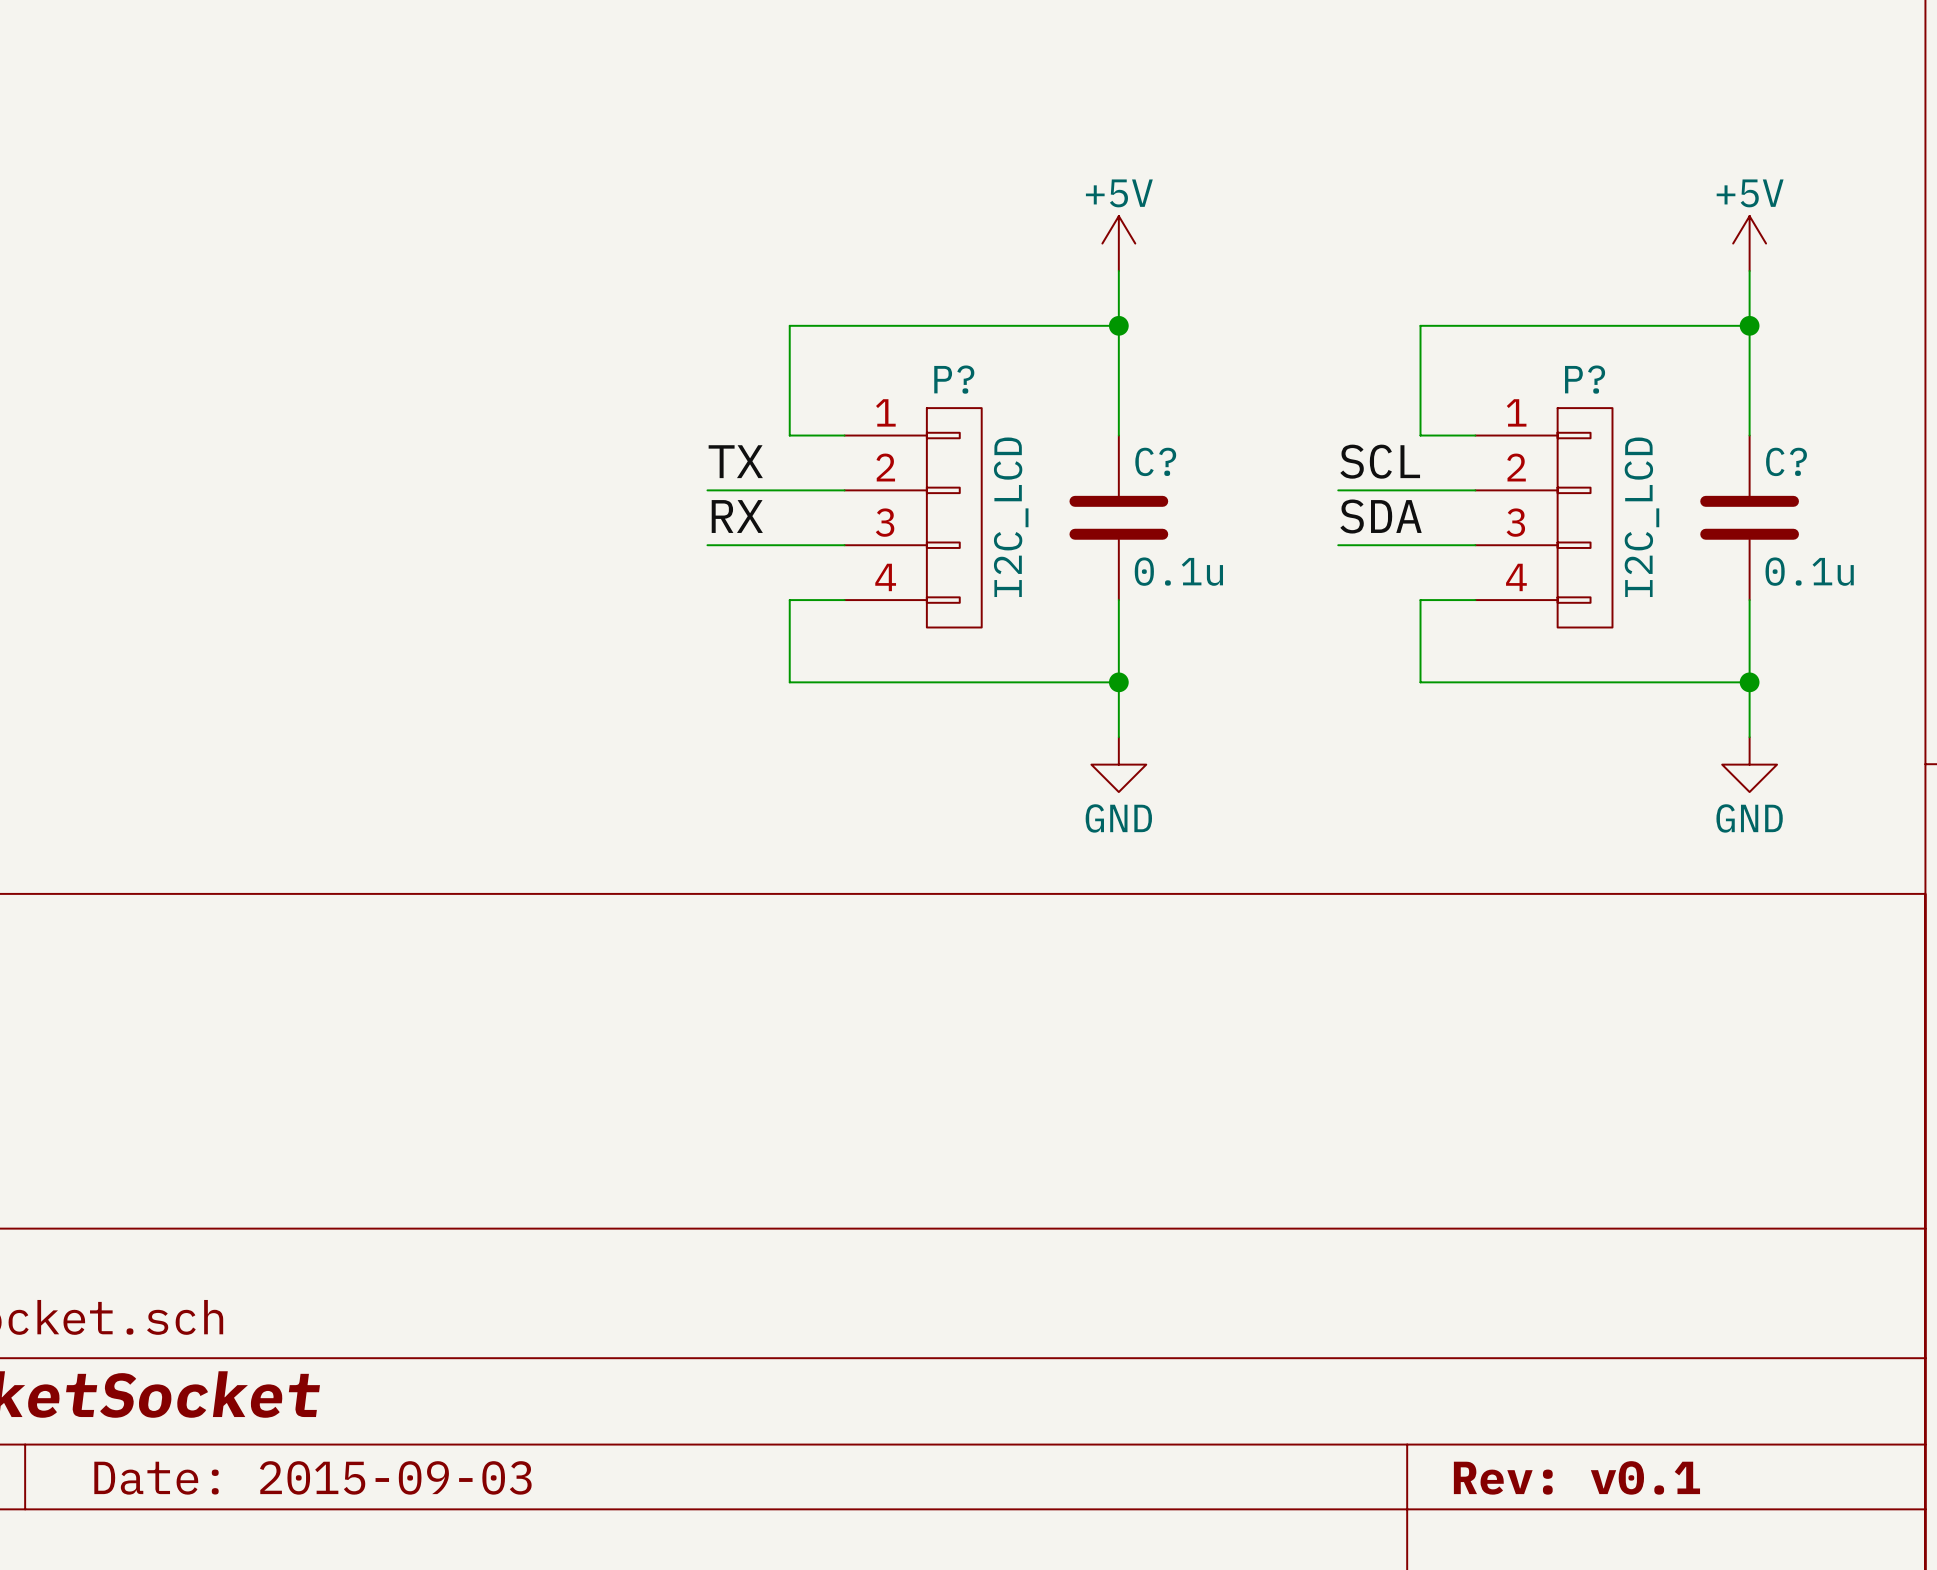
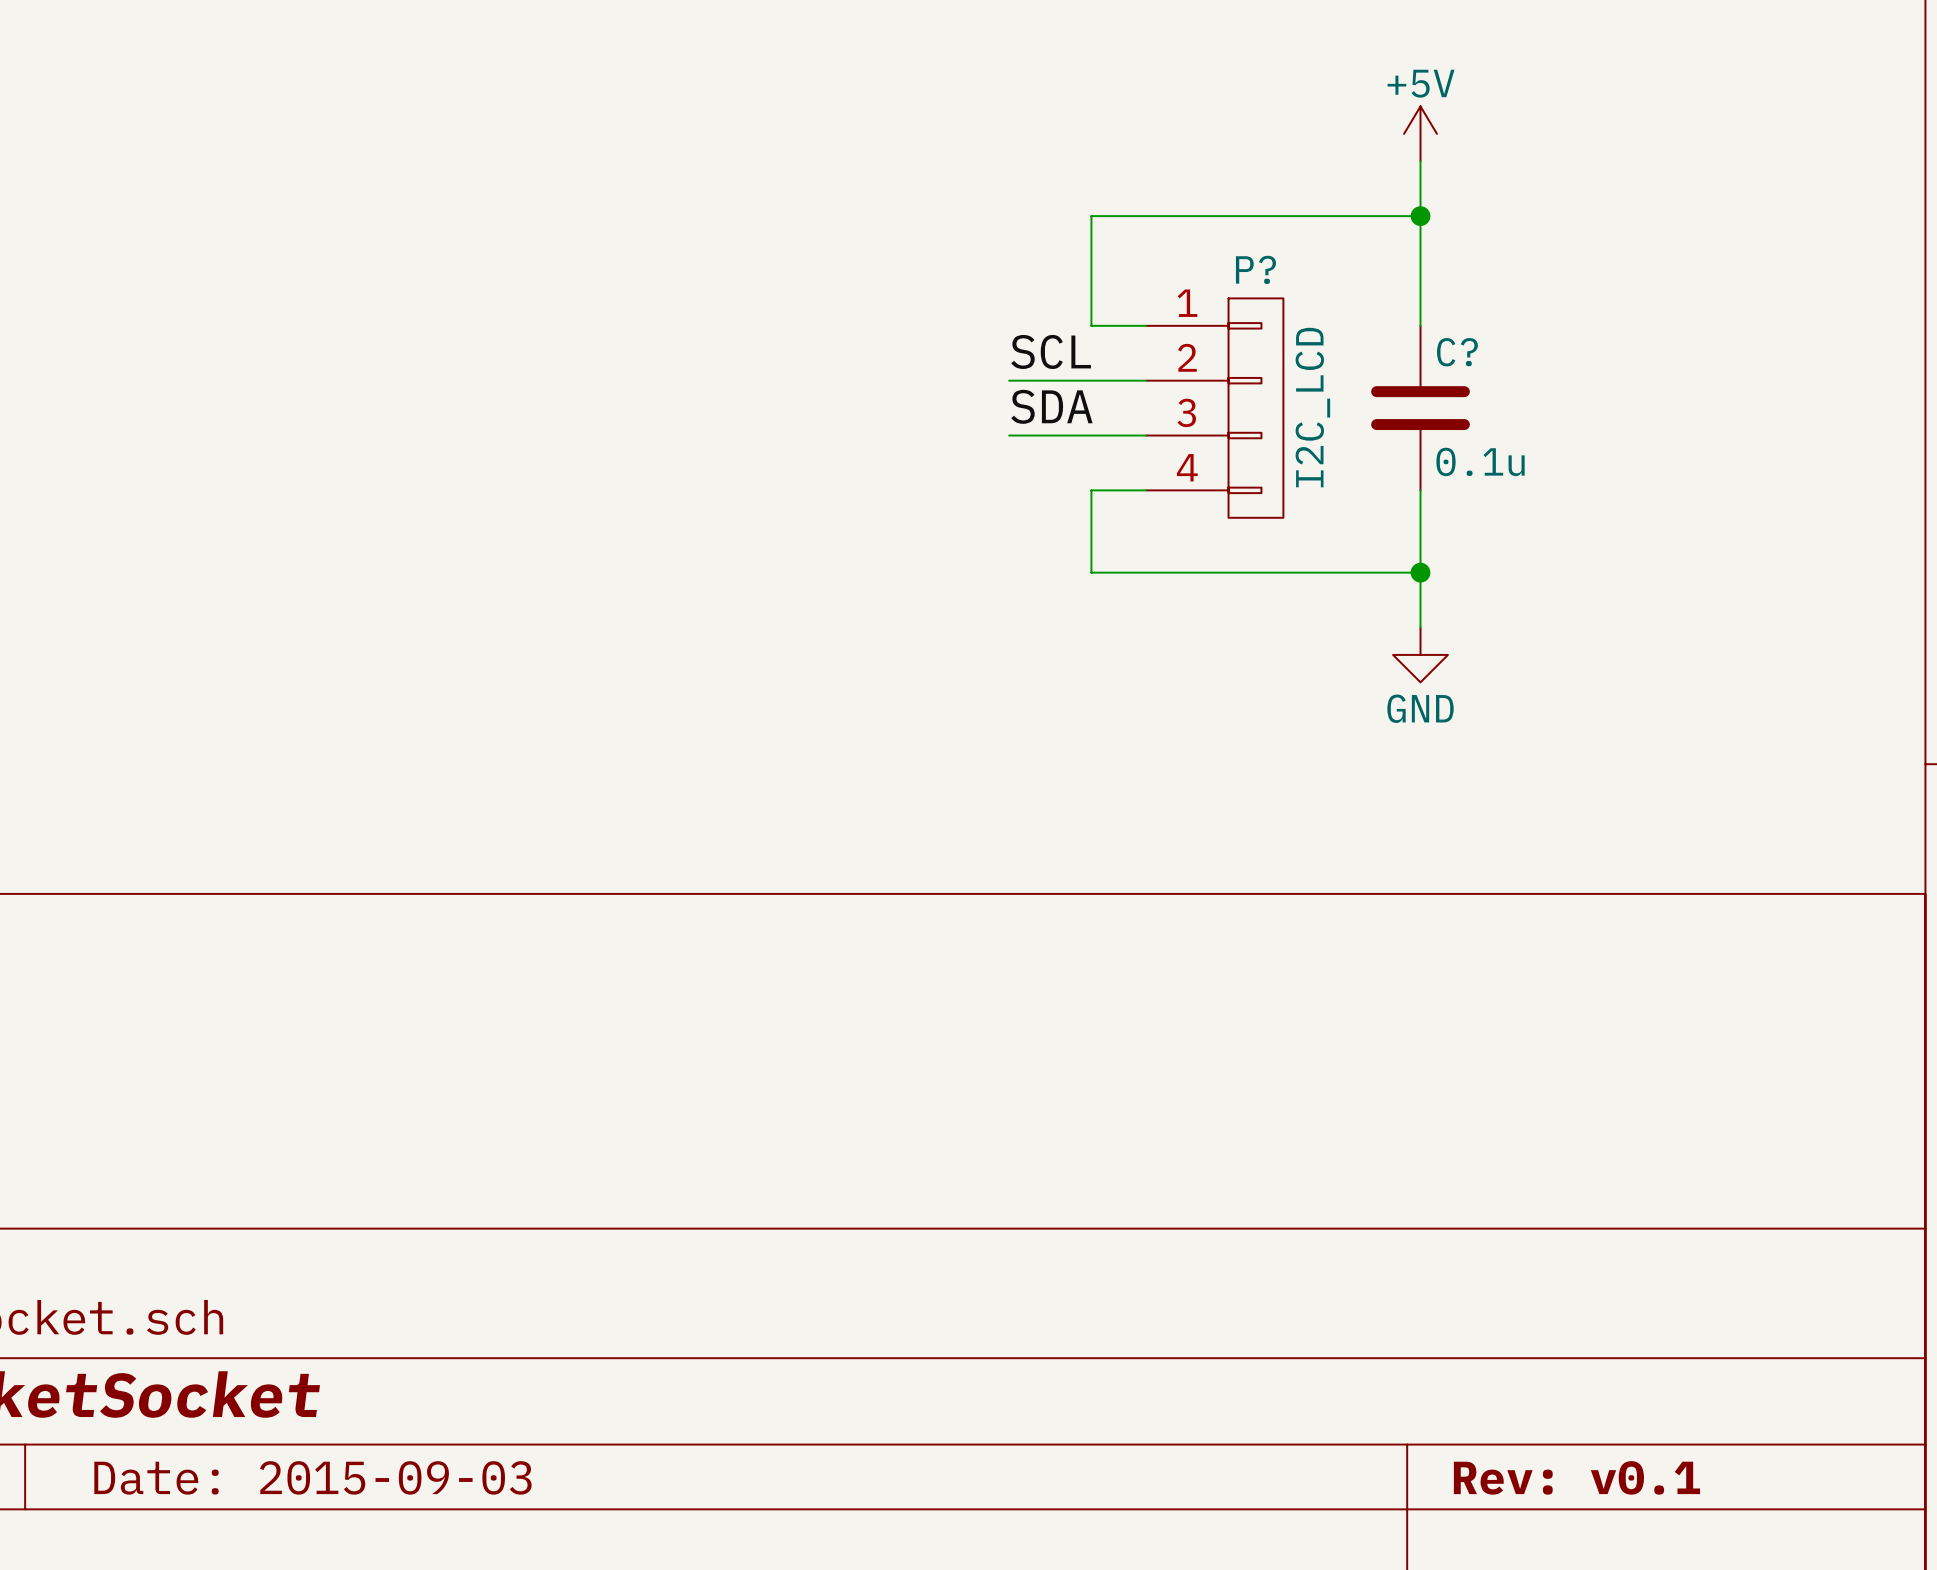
power symbol: none -> +5V (1420, 133)
junction: none -> (1420, 216)
power symbol: +5V (1118, 243) -> none
power symbol: +5V (1749, 243) -> none
wire: (1118, 270) (1118, 435) -> (1420, 161) (1420, 325)
wire: (1749, 270) (1749, 435) -> none
wire: (1091, 325) (789, 325) (789, 435) (844, 435) -> (1091, 325) (1091, 216) (1420, 216)
wire: none -> (1118, 325) (1146, 325)
junction: (1118, 325) -> none
wire: (1749, 325) (1420, 325) (1420, 435) (1475, 435) -> none
junction: (1749, 325) -> none
P?: none -> I2C_LCD (1214, 408)
C?: none -> 0.1u (1420, 408)
label: TX (735, 461) -> none
label position: SCL (1380, 461) -> SCL (1051, 351)
wire: (707, 490) (844, 490) -> (1009, 380) (1146, 380)
wire: (1338, 490) (1475, 490) -> none
label: RX (737, 516) -> none
label position: SDA (1381, 516) -> SDA (1051, 406)
P?: I2C_LCD (913, 517) -> none
C?: 0.1u (1118, 517) -> none
P?: I2C_LCD (1543, 517) -> none
C?: 0.1u (1749, 517) -> none
wire: (707, 545) (844, 545) -> (1009, 435) (1146, 435)
wire: (1338, 545) (1475, 545) -> none
junction: none -> (1420, 572)
wire: (844, 600) (789, 600) (789, 682) (1118, 682) -> (1146, 490) (1091, 490) (1091, 572) (1420, 572)
wire: (1118, 600) (1118, 737) -> none
wire: (1420, 600) (1475, 600) -> (1420, 600) (1420, 490)
wire: (1749, 600) (1749, 737) -> none
wire: (1420, 627) (1420, 682) (1749, 682) -> none
power symbol: none -> GND (1420, 654)
junction: (1118, 682) -> none
junction: (1749, 682) -> none
power symbol: GND (1118, 764) -> none
power symbol: GND (1749, 764) -> none

